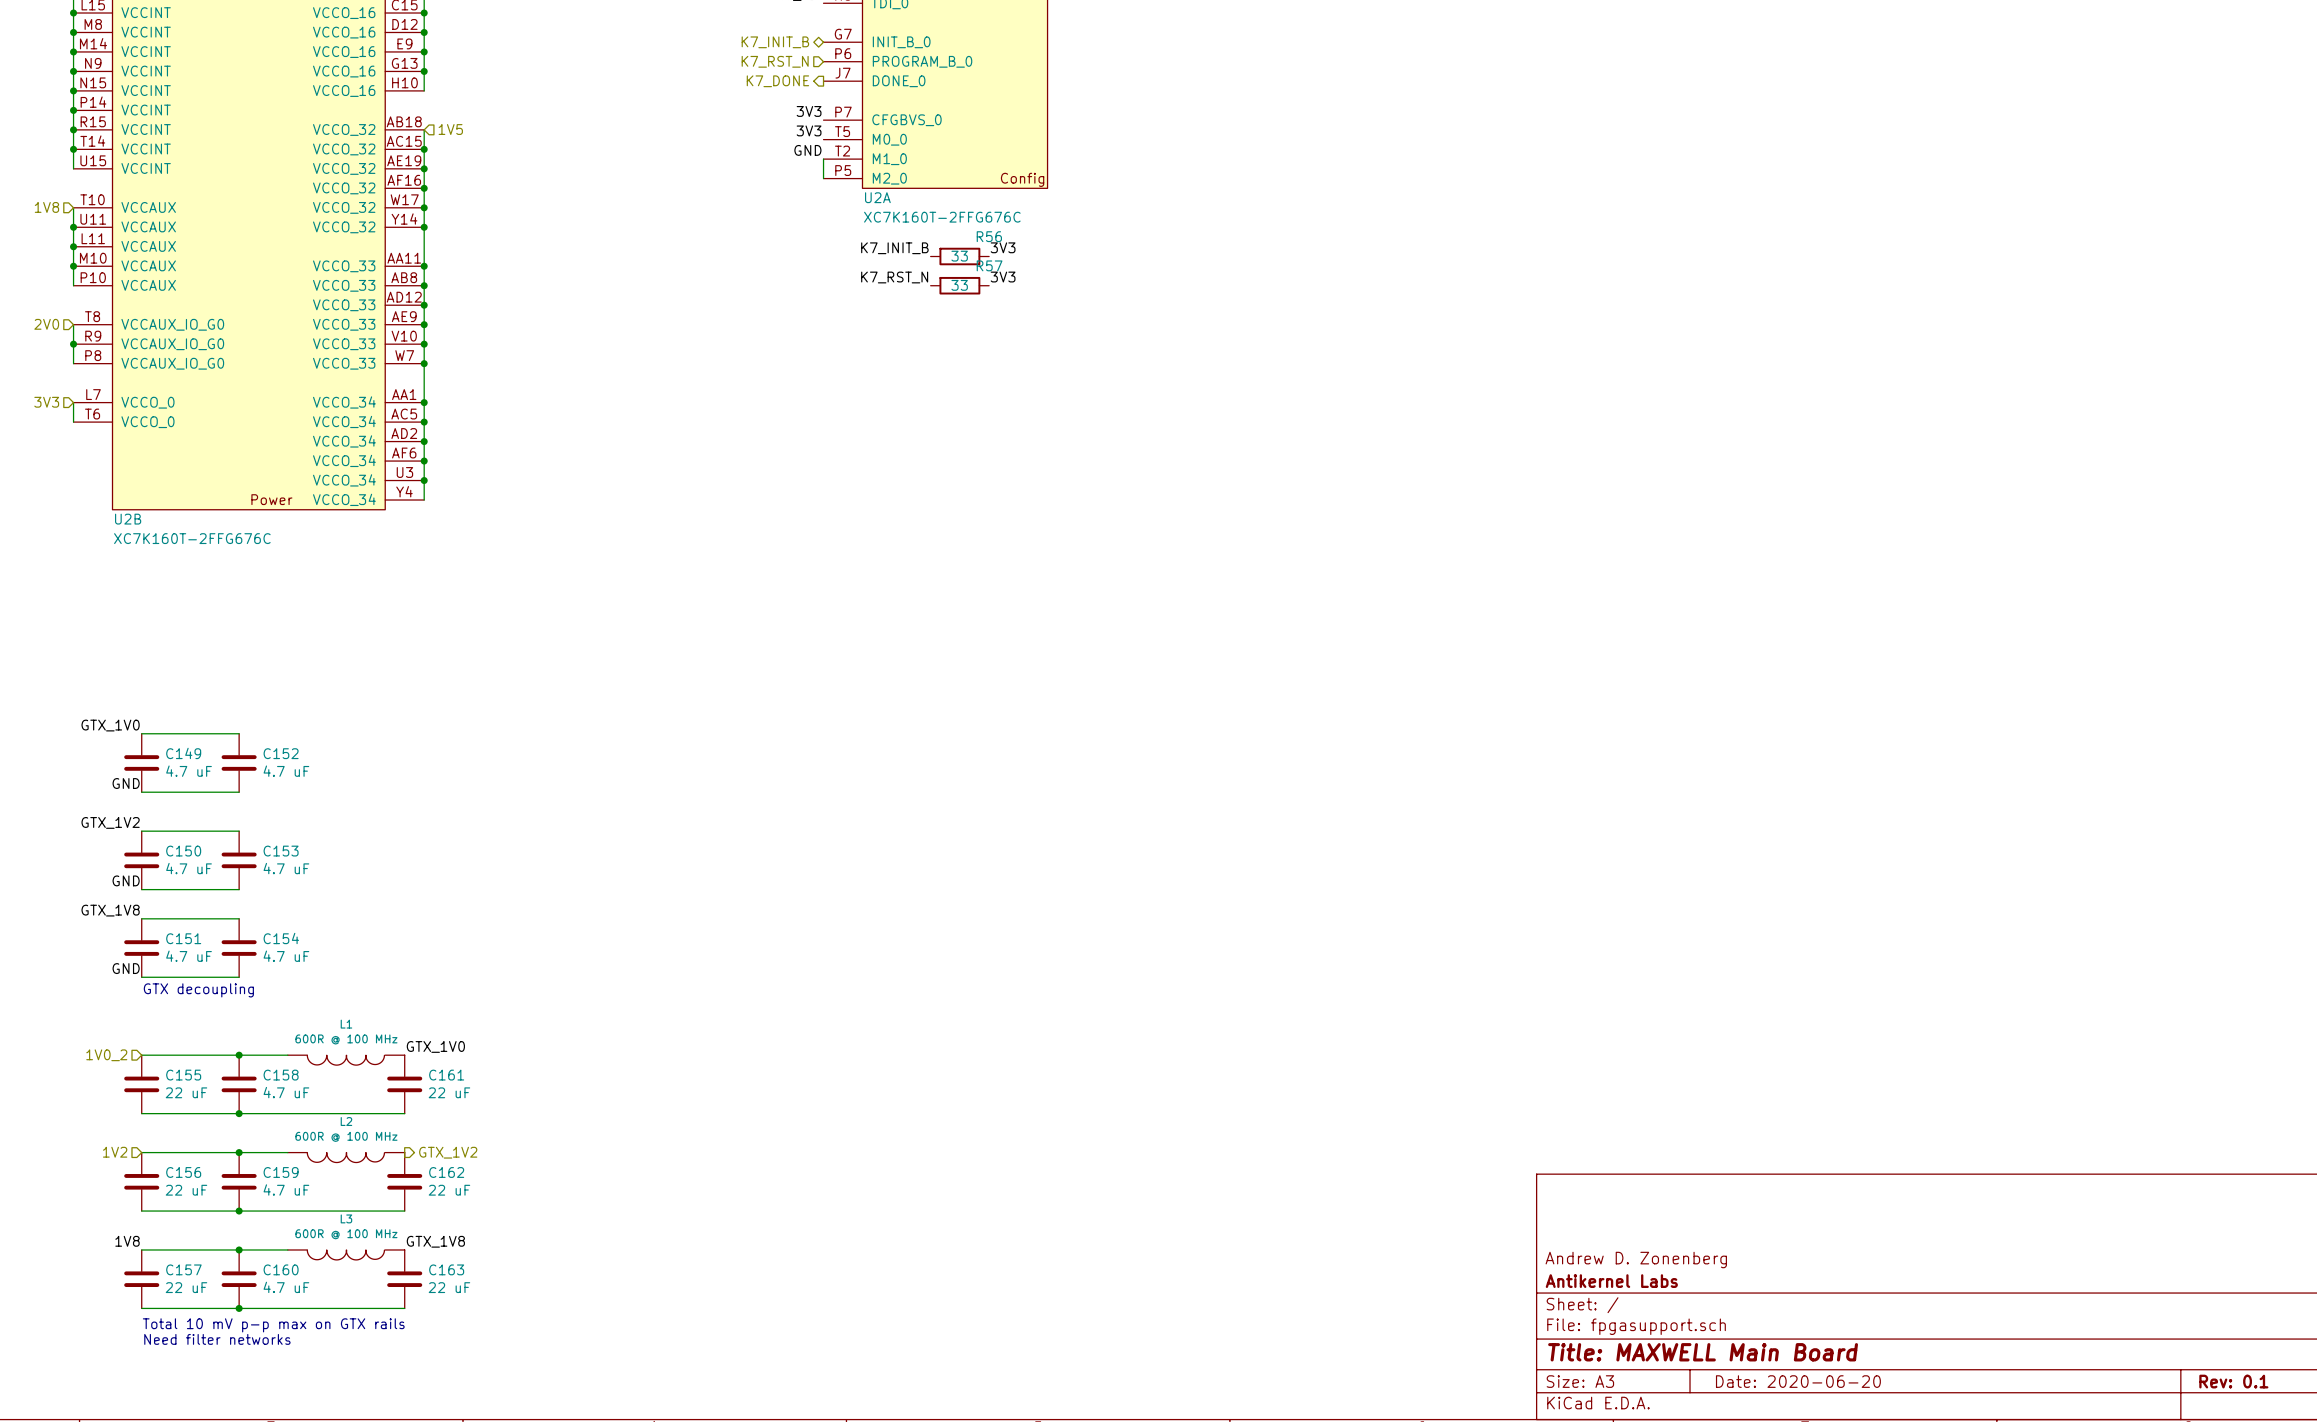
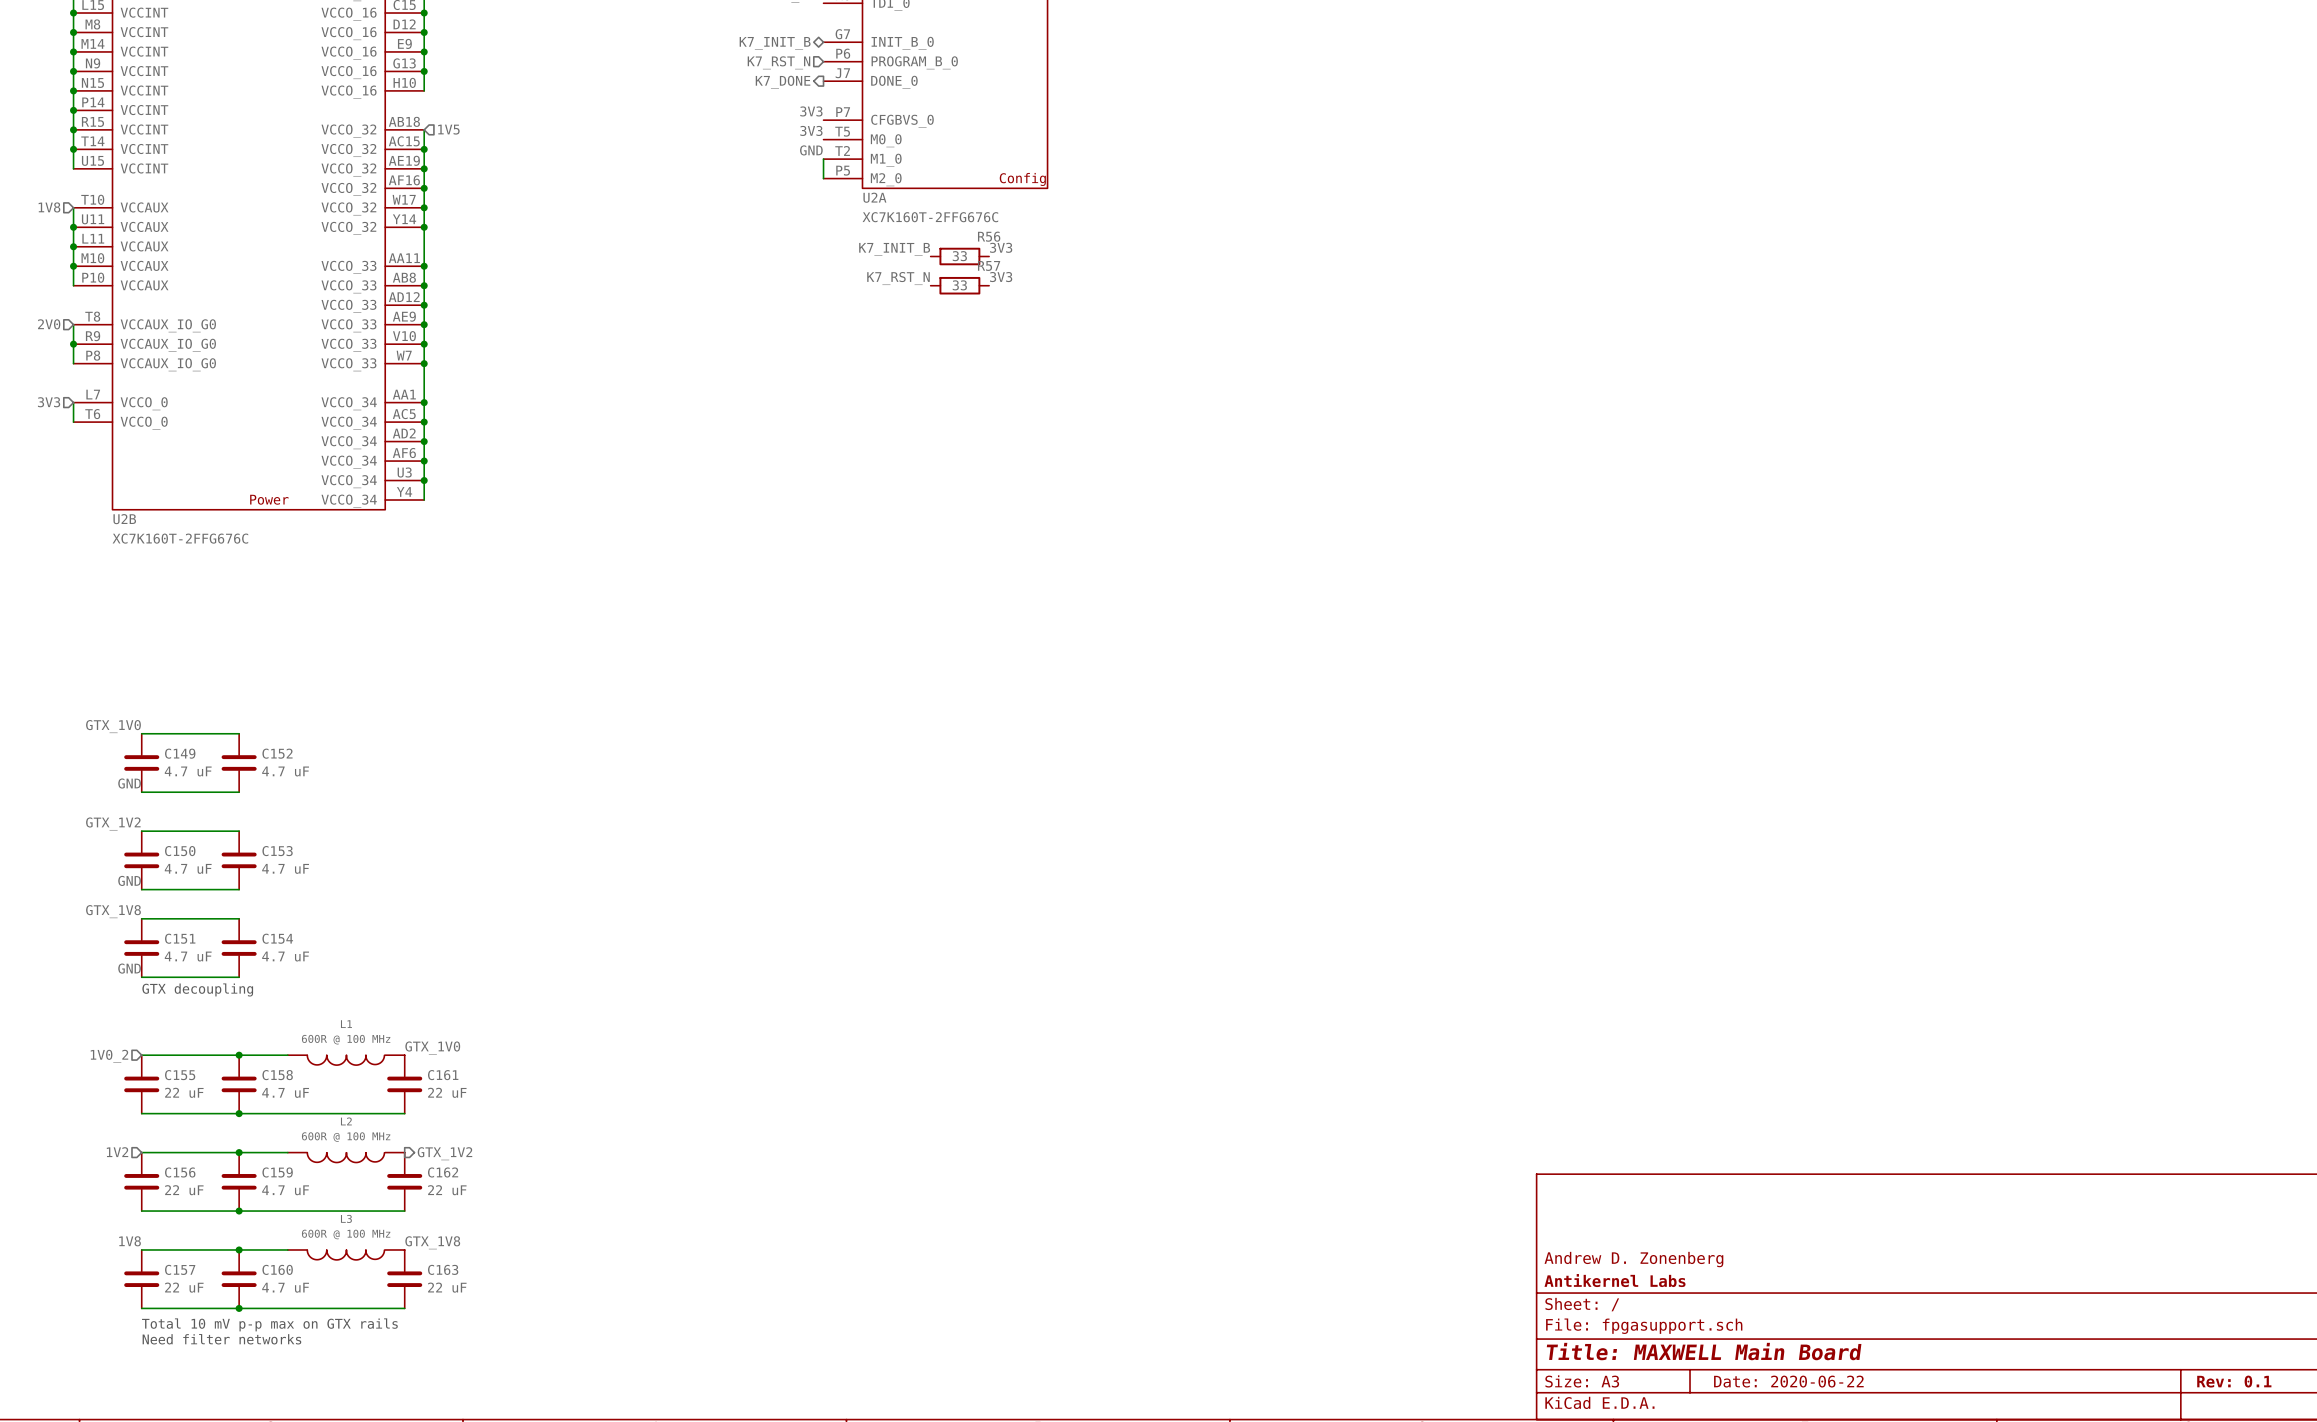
title block: Date: 2020-06-20 (1798, 1381) -> Date: 2020-06-22 (1788, 1381)

